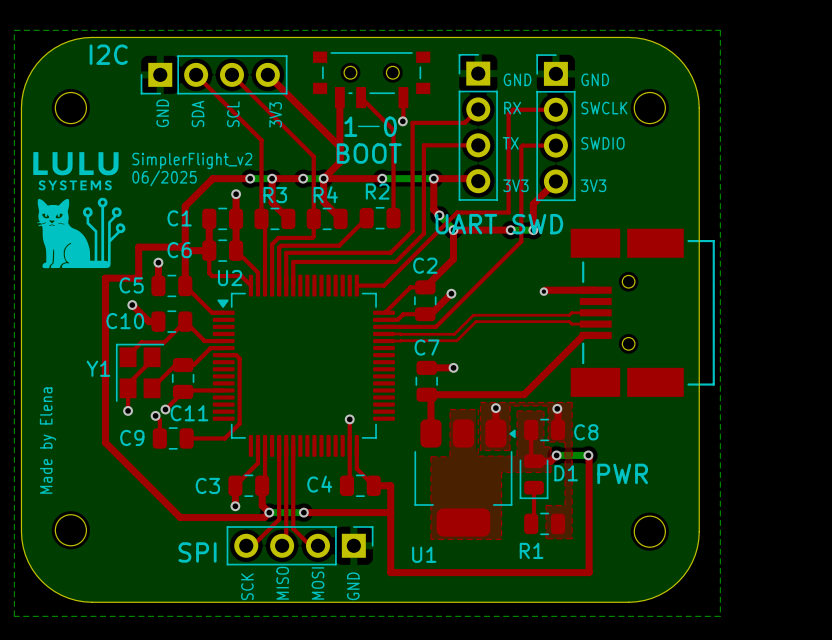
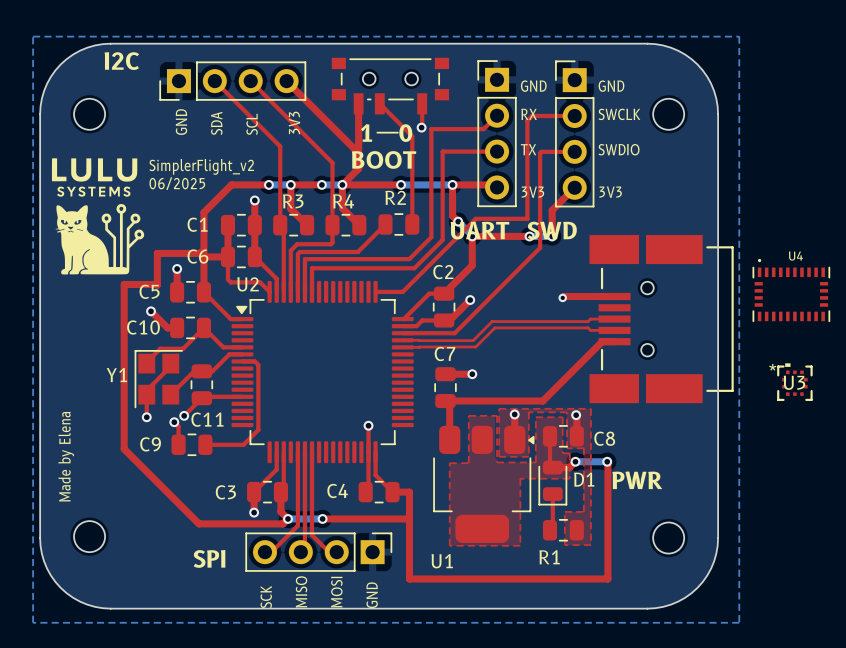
U4: none -> (791, 290)
U3: none -> (794, 382)

